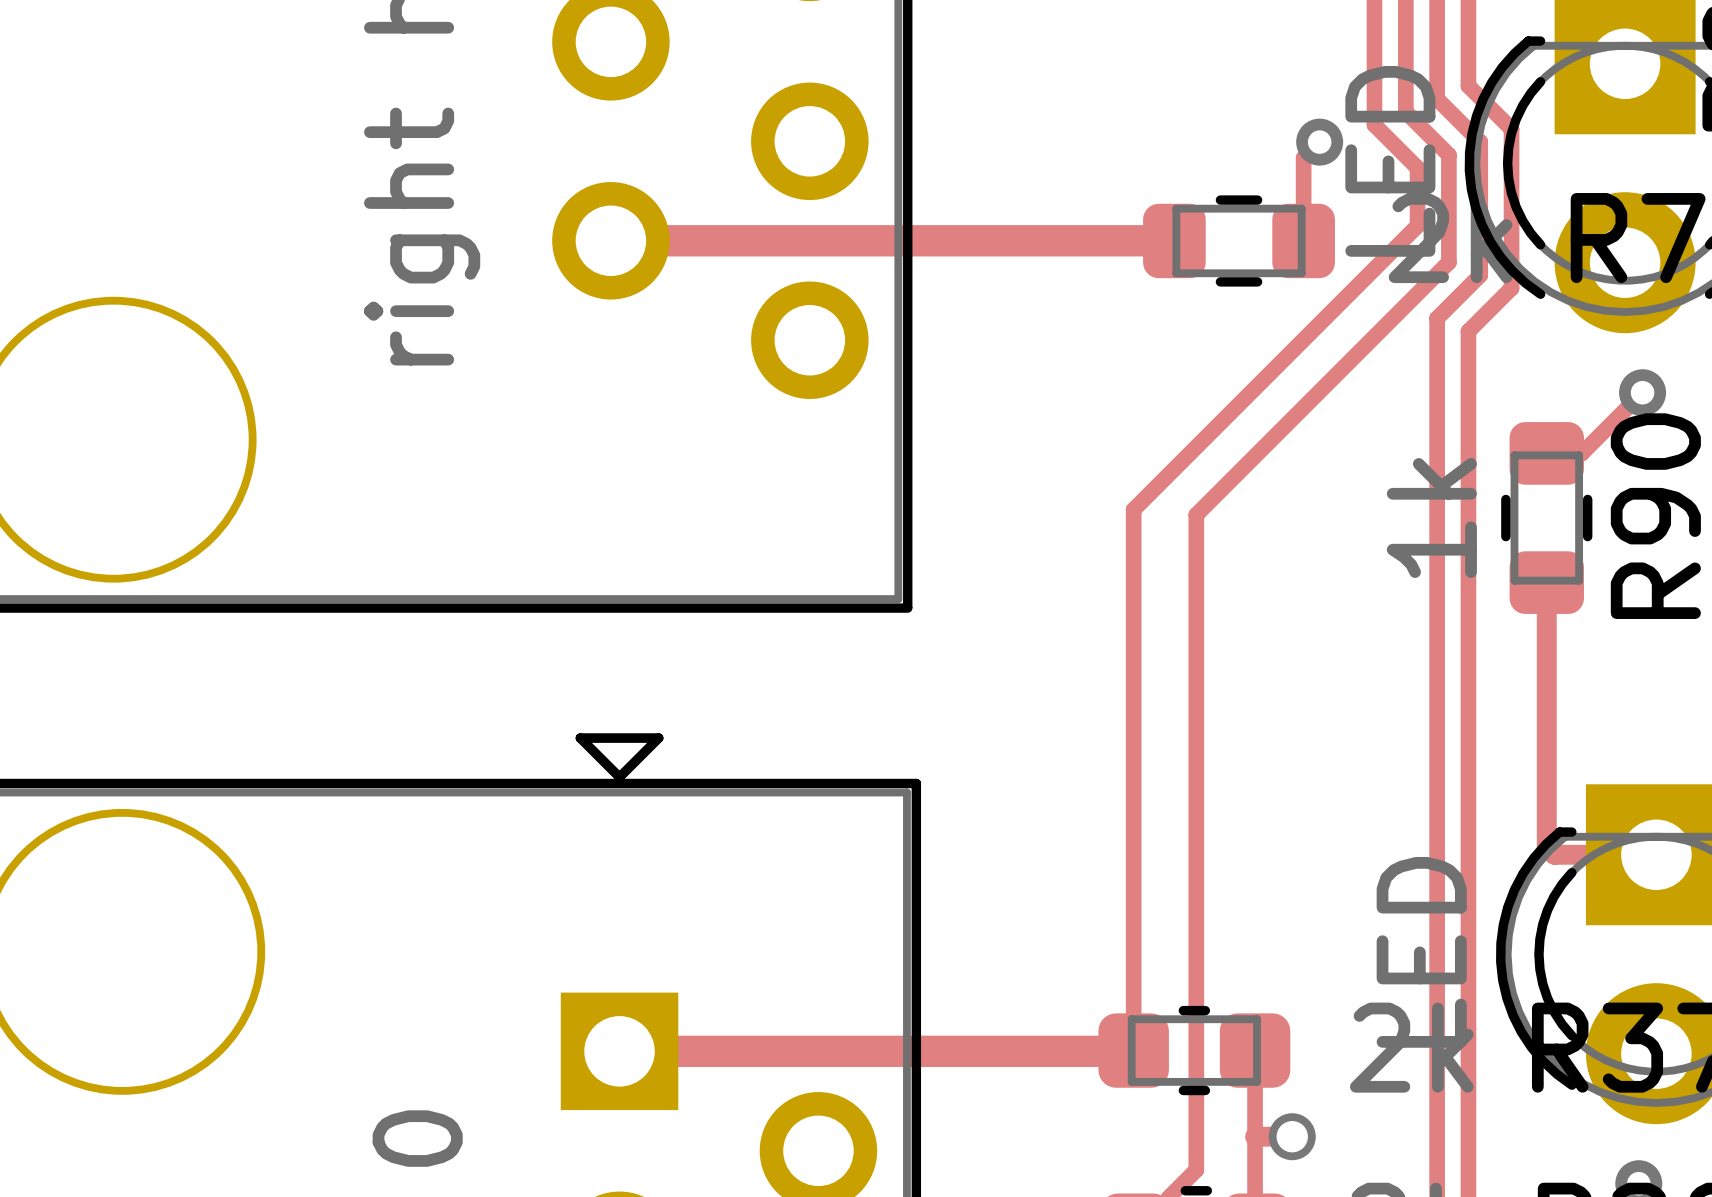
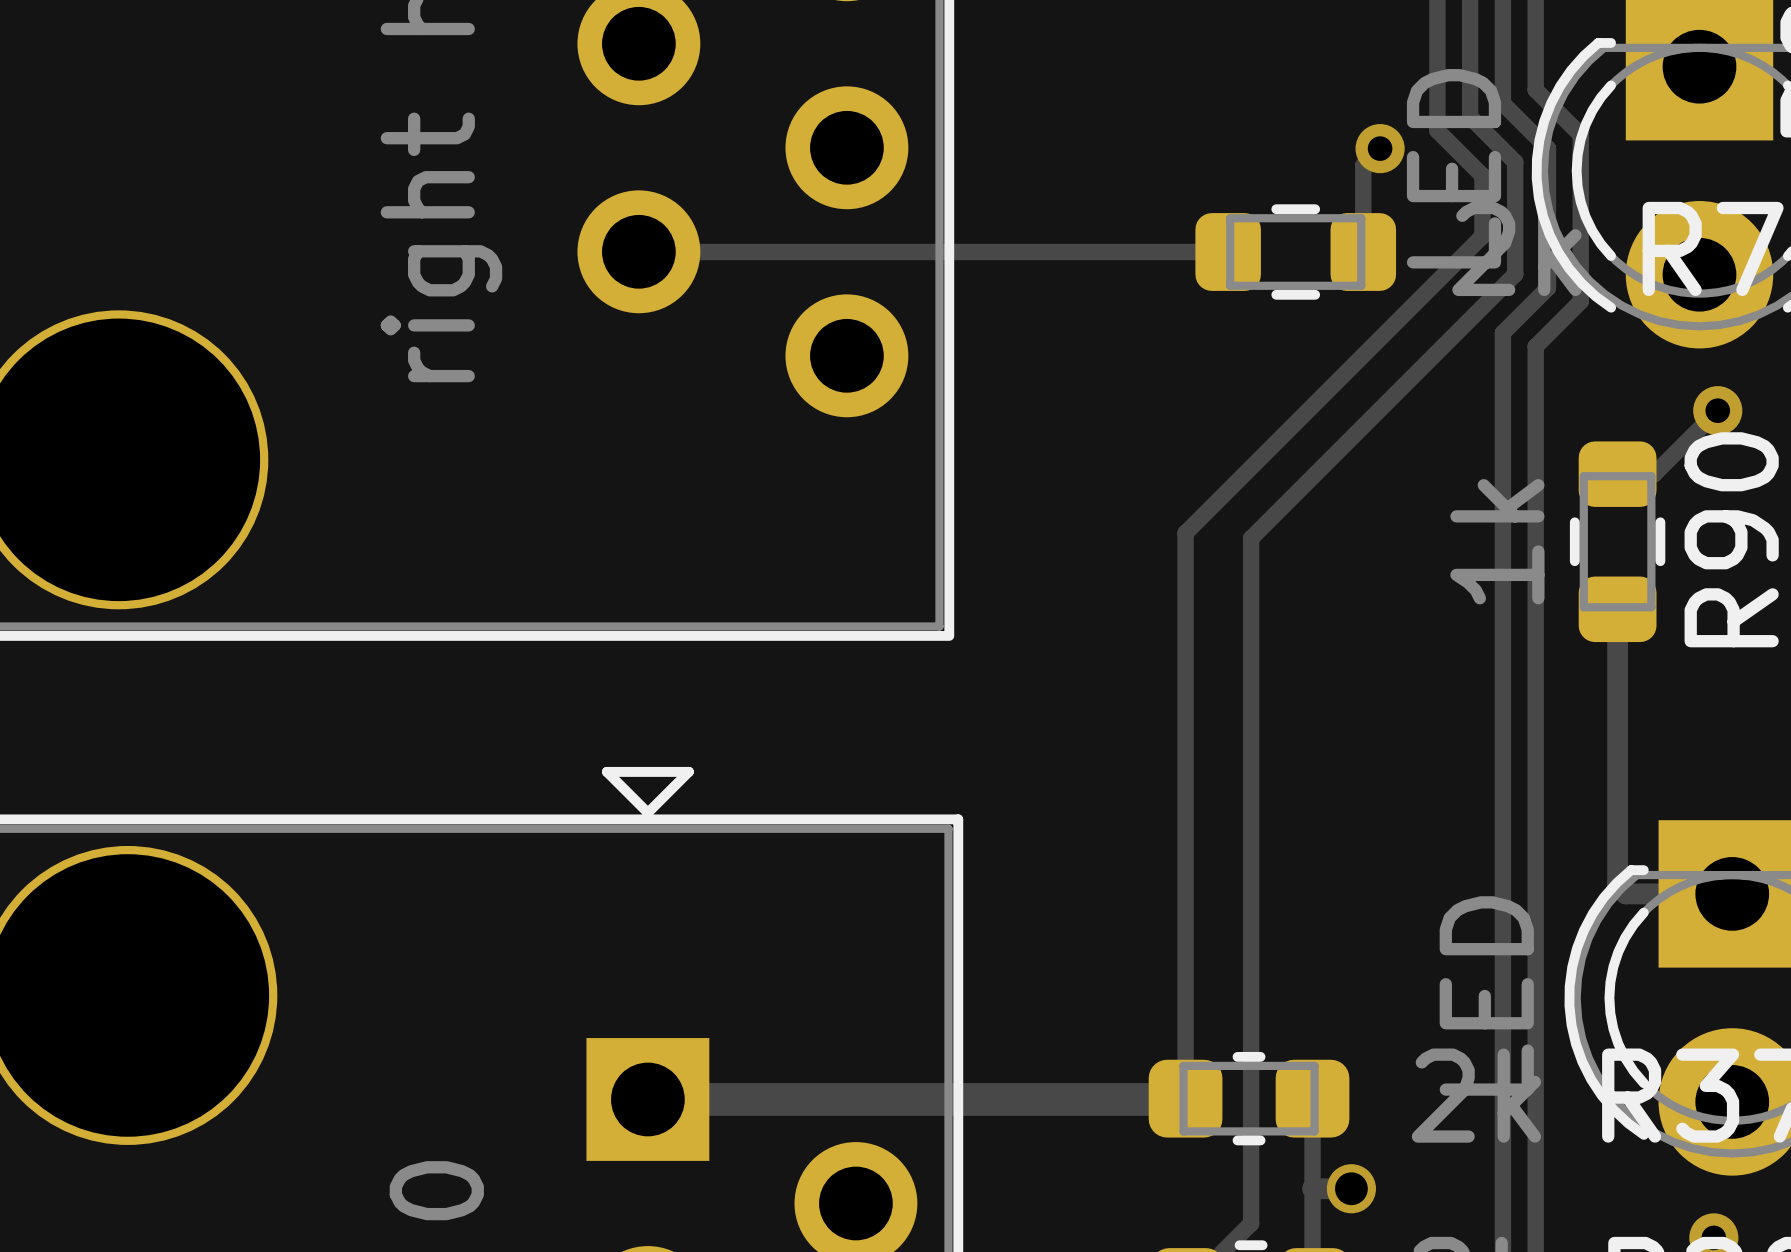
track width: thick (610, 240) (1174, 240) -> thin (638, 251) (1227, 251)

